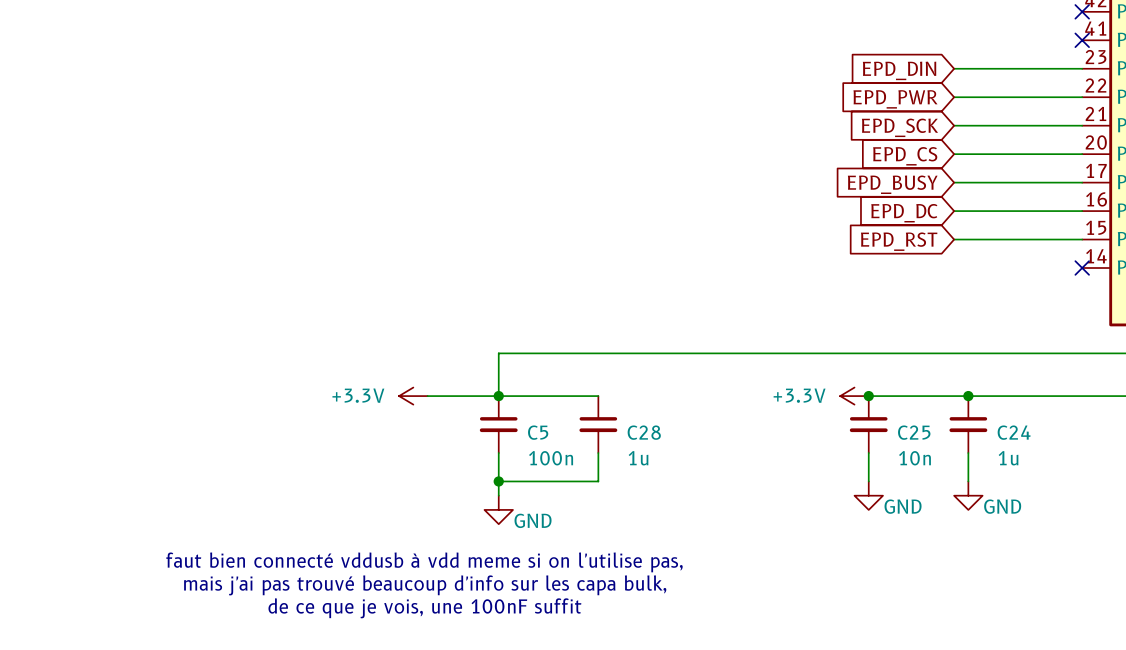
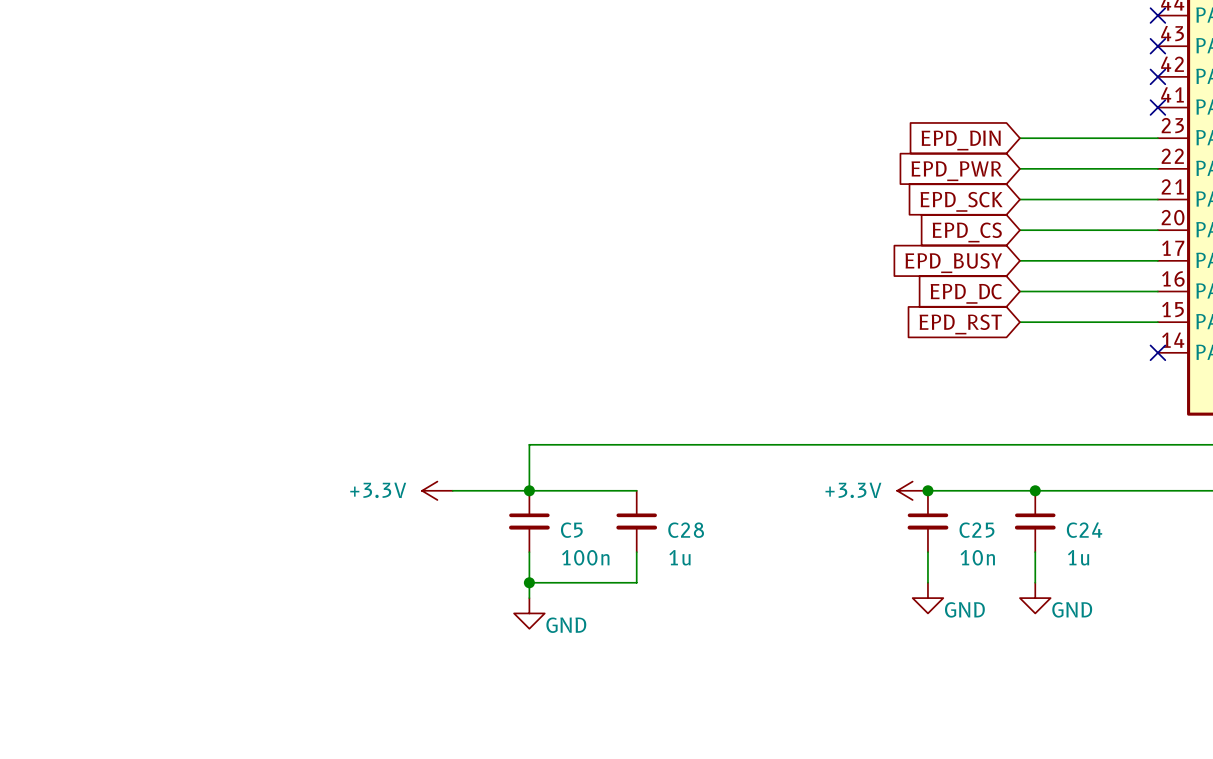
text: faut bien connecté vddusb à vdd meme si on l'utilise pas, (424, 562) -> none
text: mais j'ai pas trouvé beaucoup d'info sur les capa bulk, (425, 585) -> none
text: de ce que je vois, une 100nF suffit (424, 608) -> none

